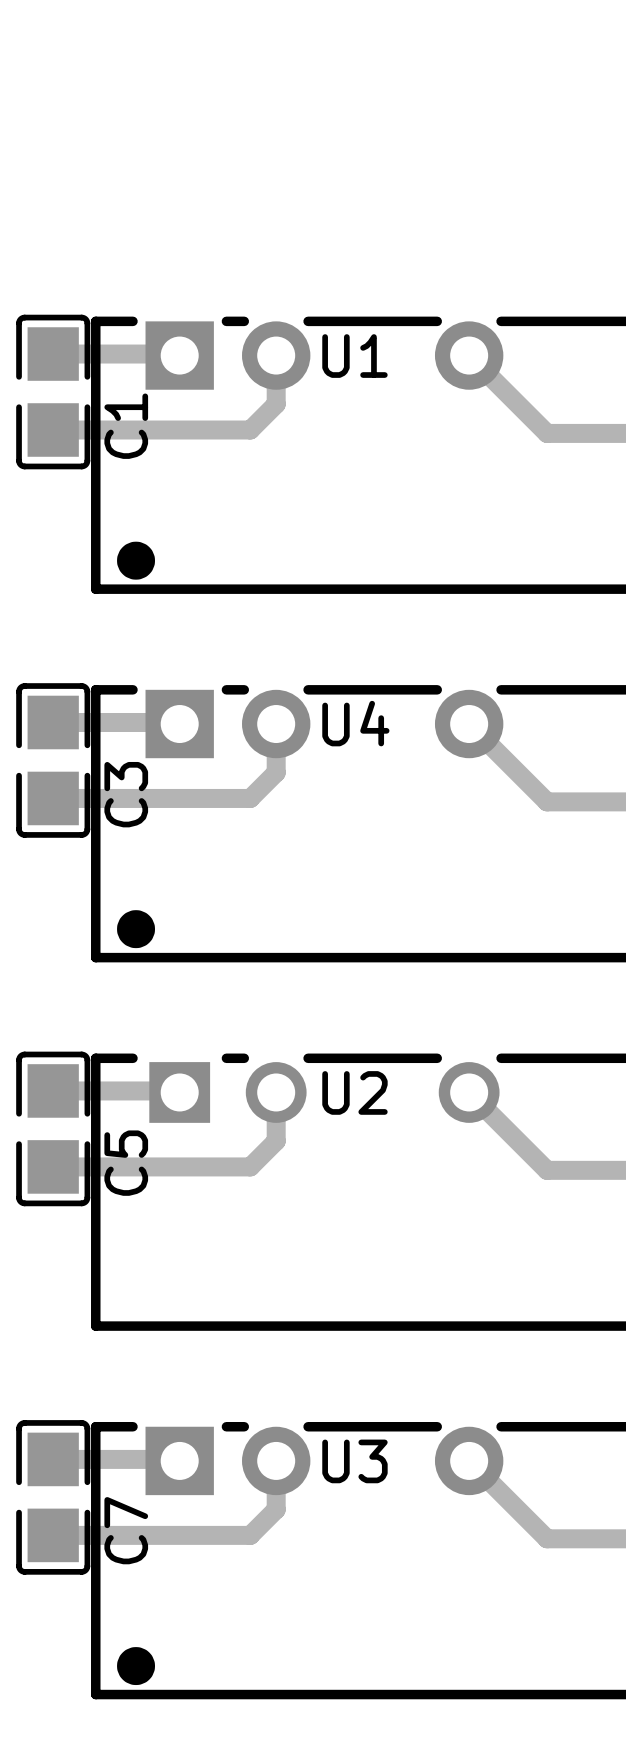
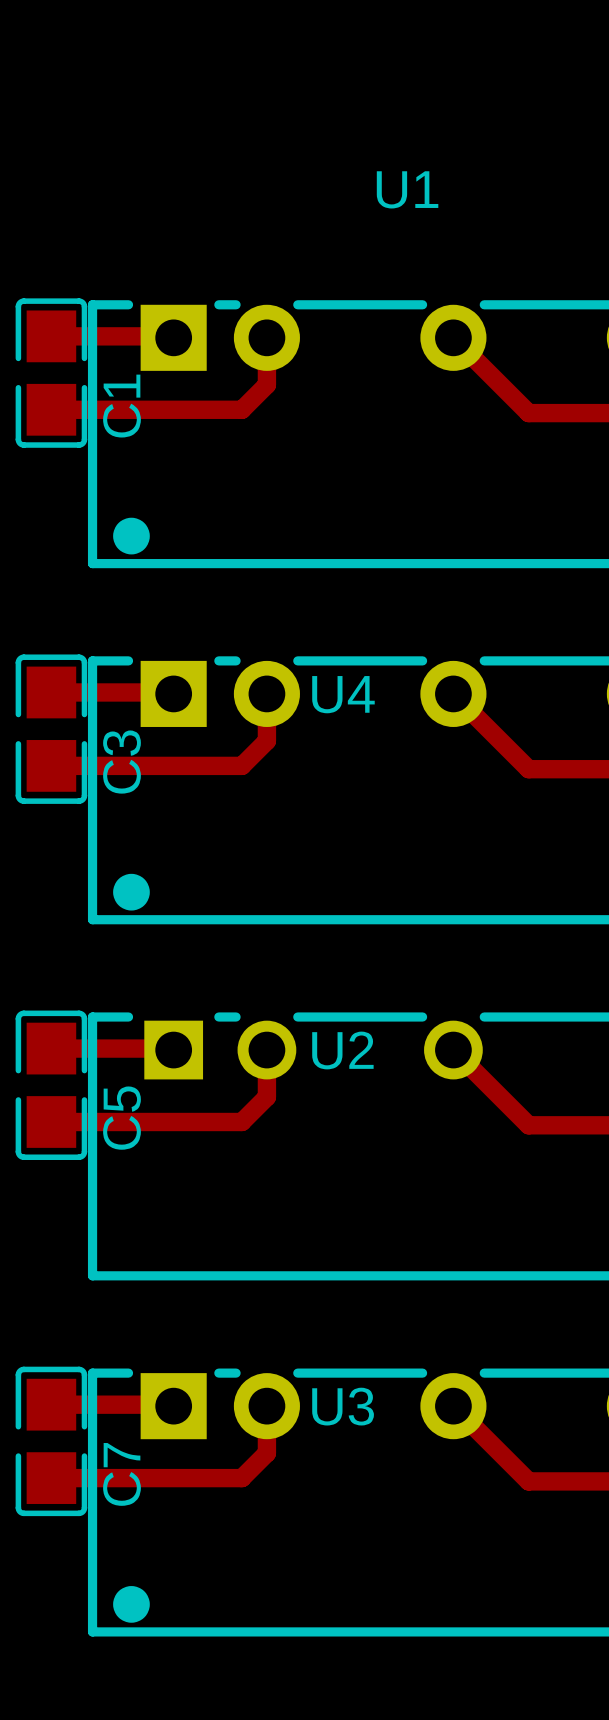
U1 name position: U1 (354, 356) -> U1 (407, 189)

